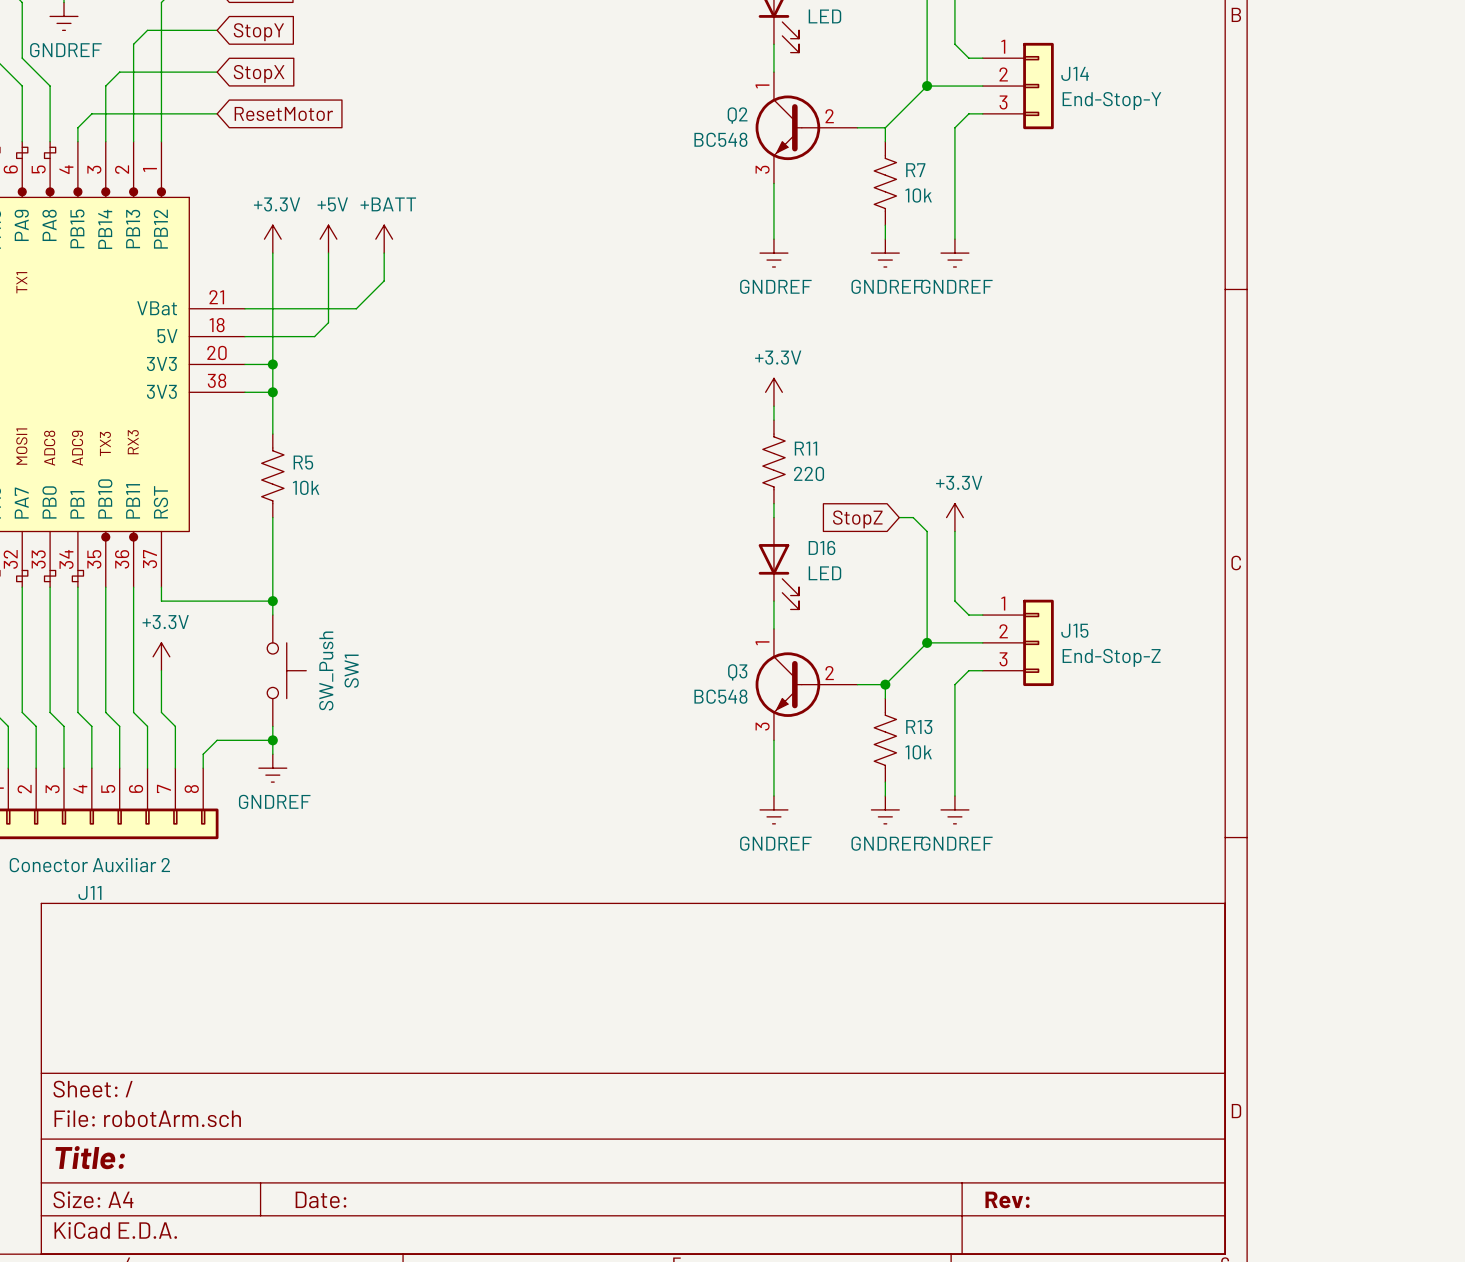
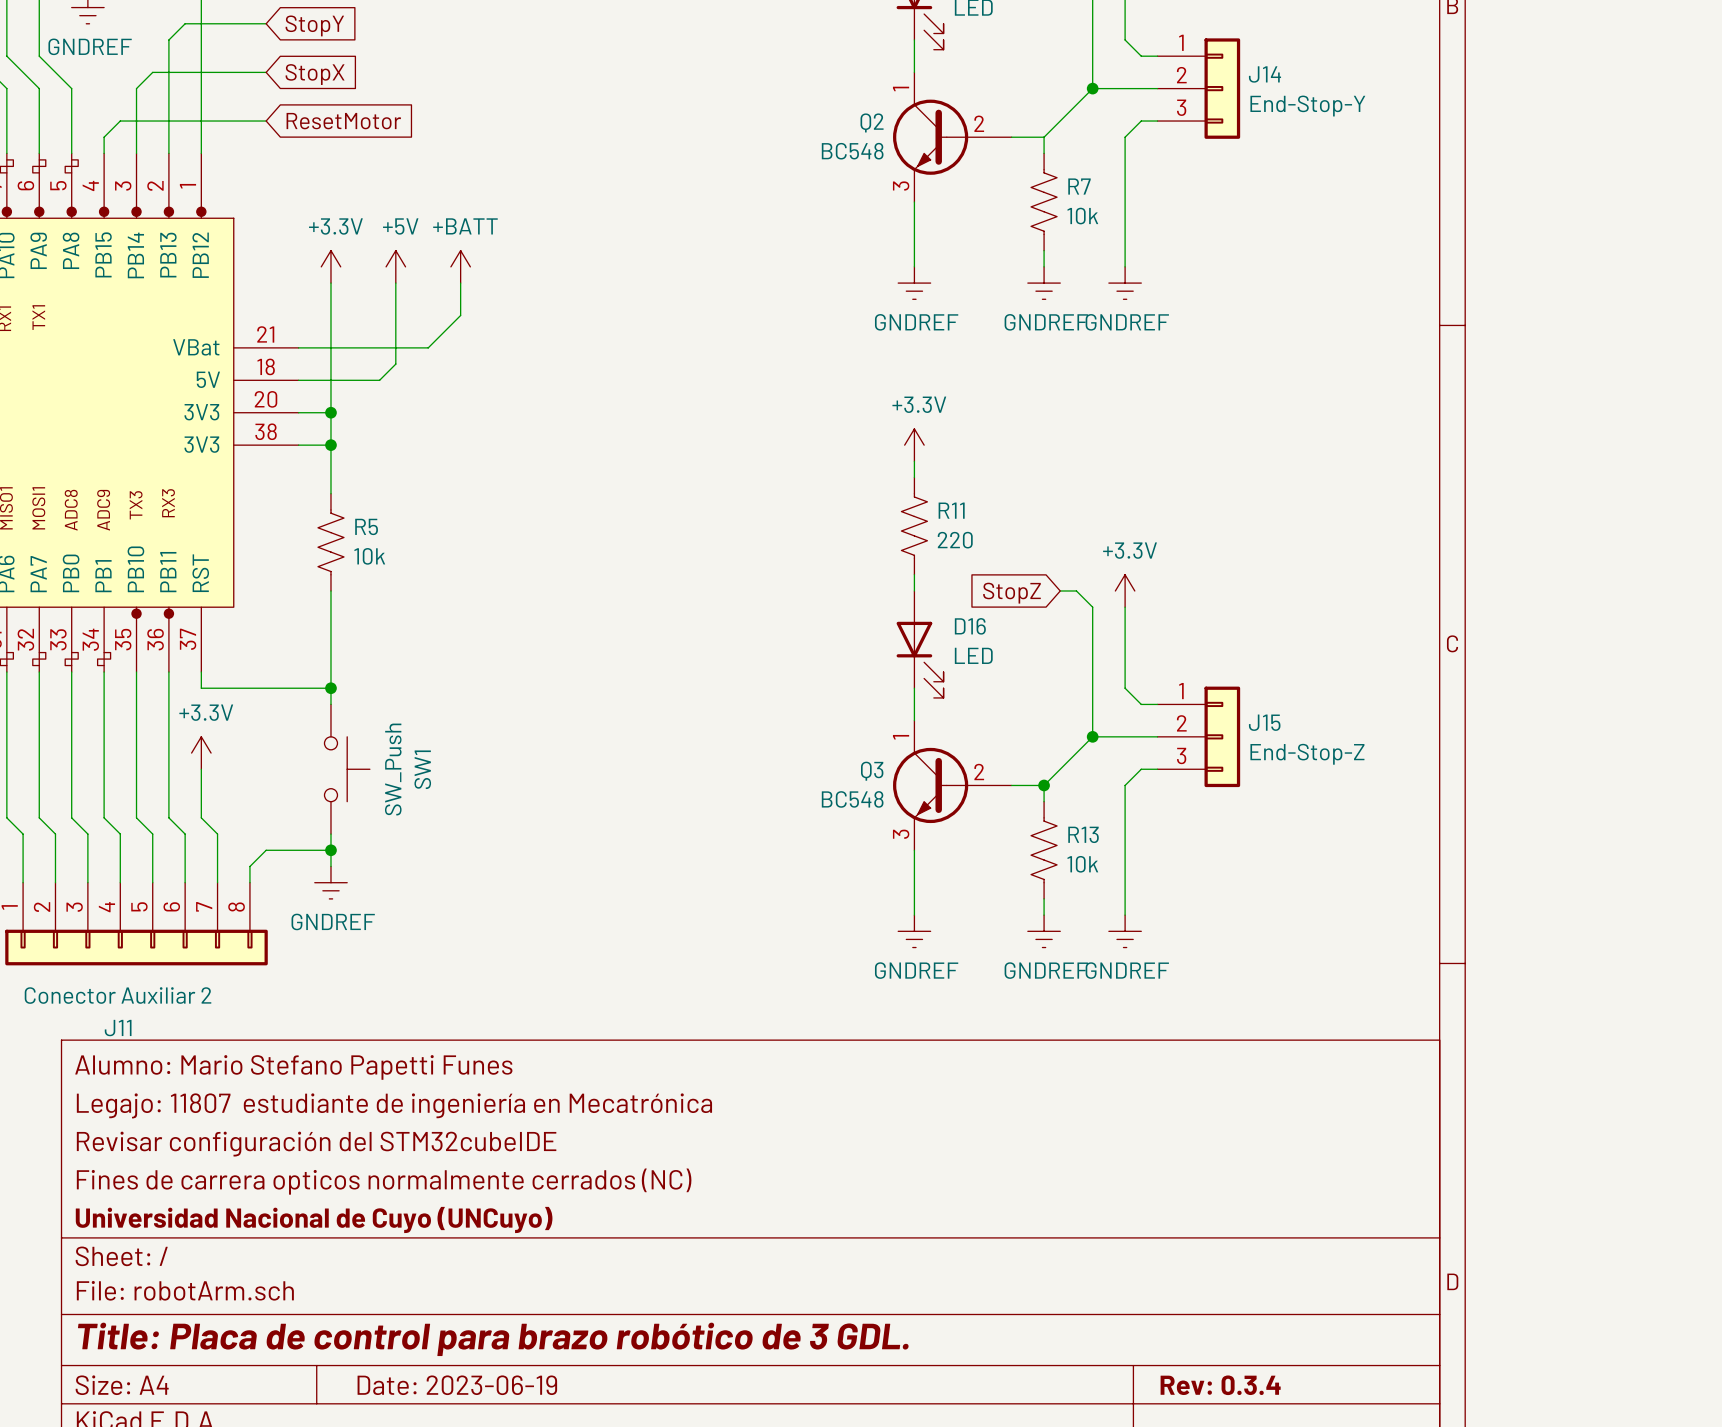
title block: none -> Alumno: Mario Stefano Papetti Funes (293, 1067)
title block: none -> Legajo: 11807 estudiante de ingeniería en Mecatrónica (394, 1105)
title block: none -> Revisar configuración del STM32cubeIDE (316, 1144)
title block: none -> Fines de carrera opticos normalmente cerrados (NC) (384, 1181)
title block: none -> Universidad Nacional de Cuyo (UNCuyo) (314, 1219)
title block: Title: (90, 1157) -> Title: Placa de control para brazo robótico de 3 GDL. (493, 1339)
title block: Date: (320, 1199) -> Date: 2023-06-19 (457, 1385)
title block: Rev: (1007, 1199) -> Rev: 0.3.4 (1220, 1385)

